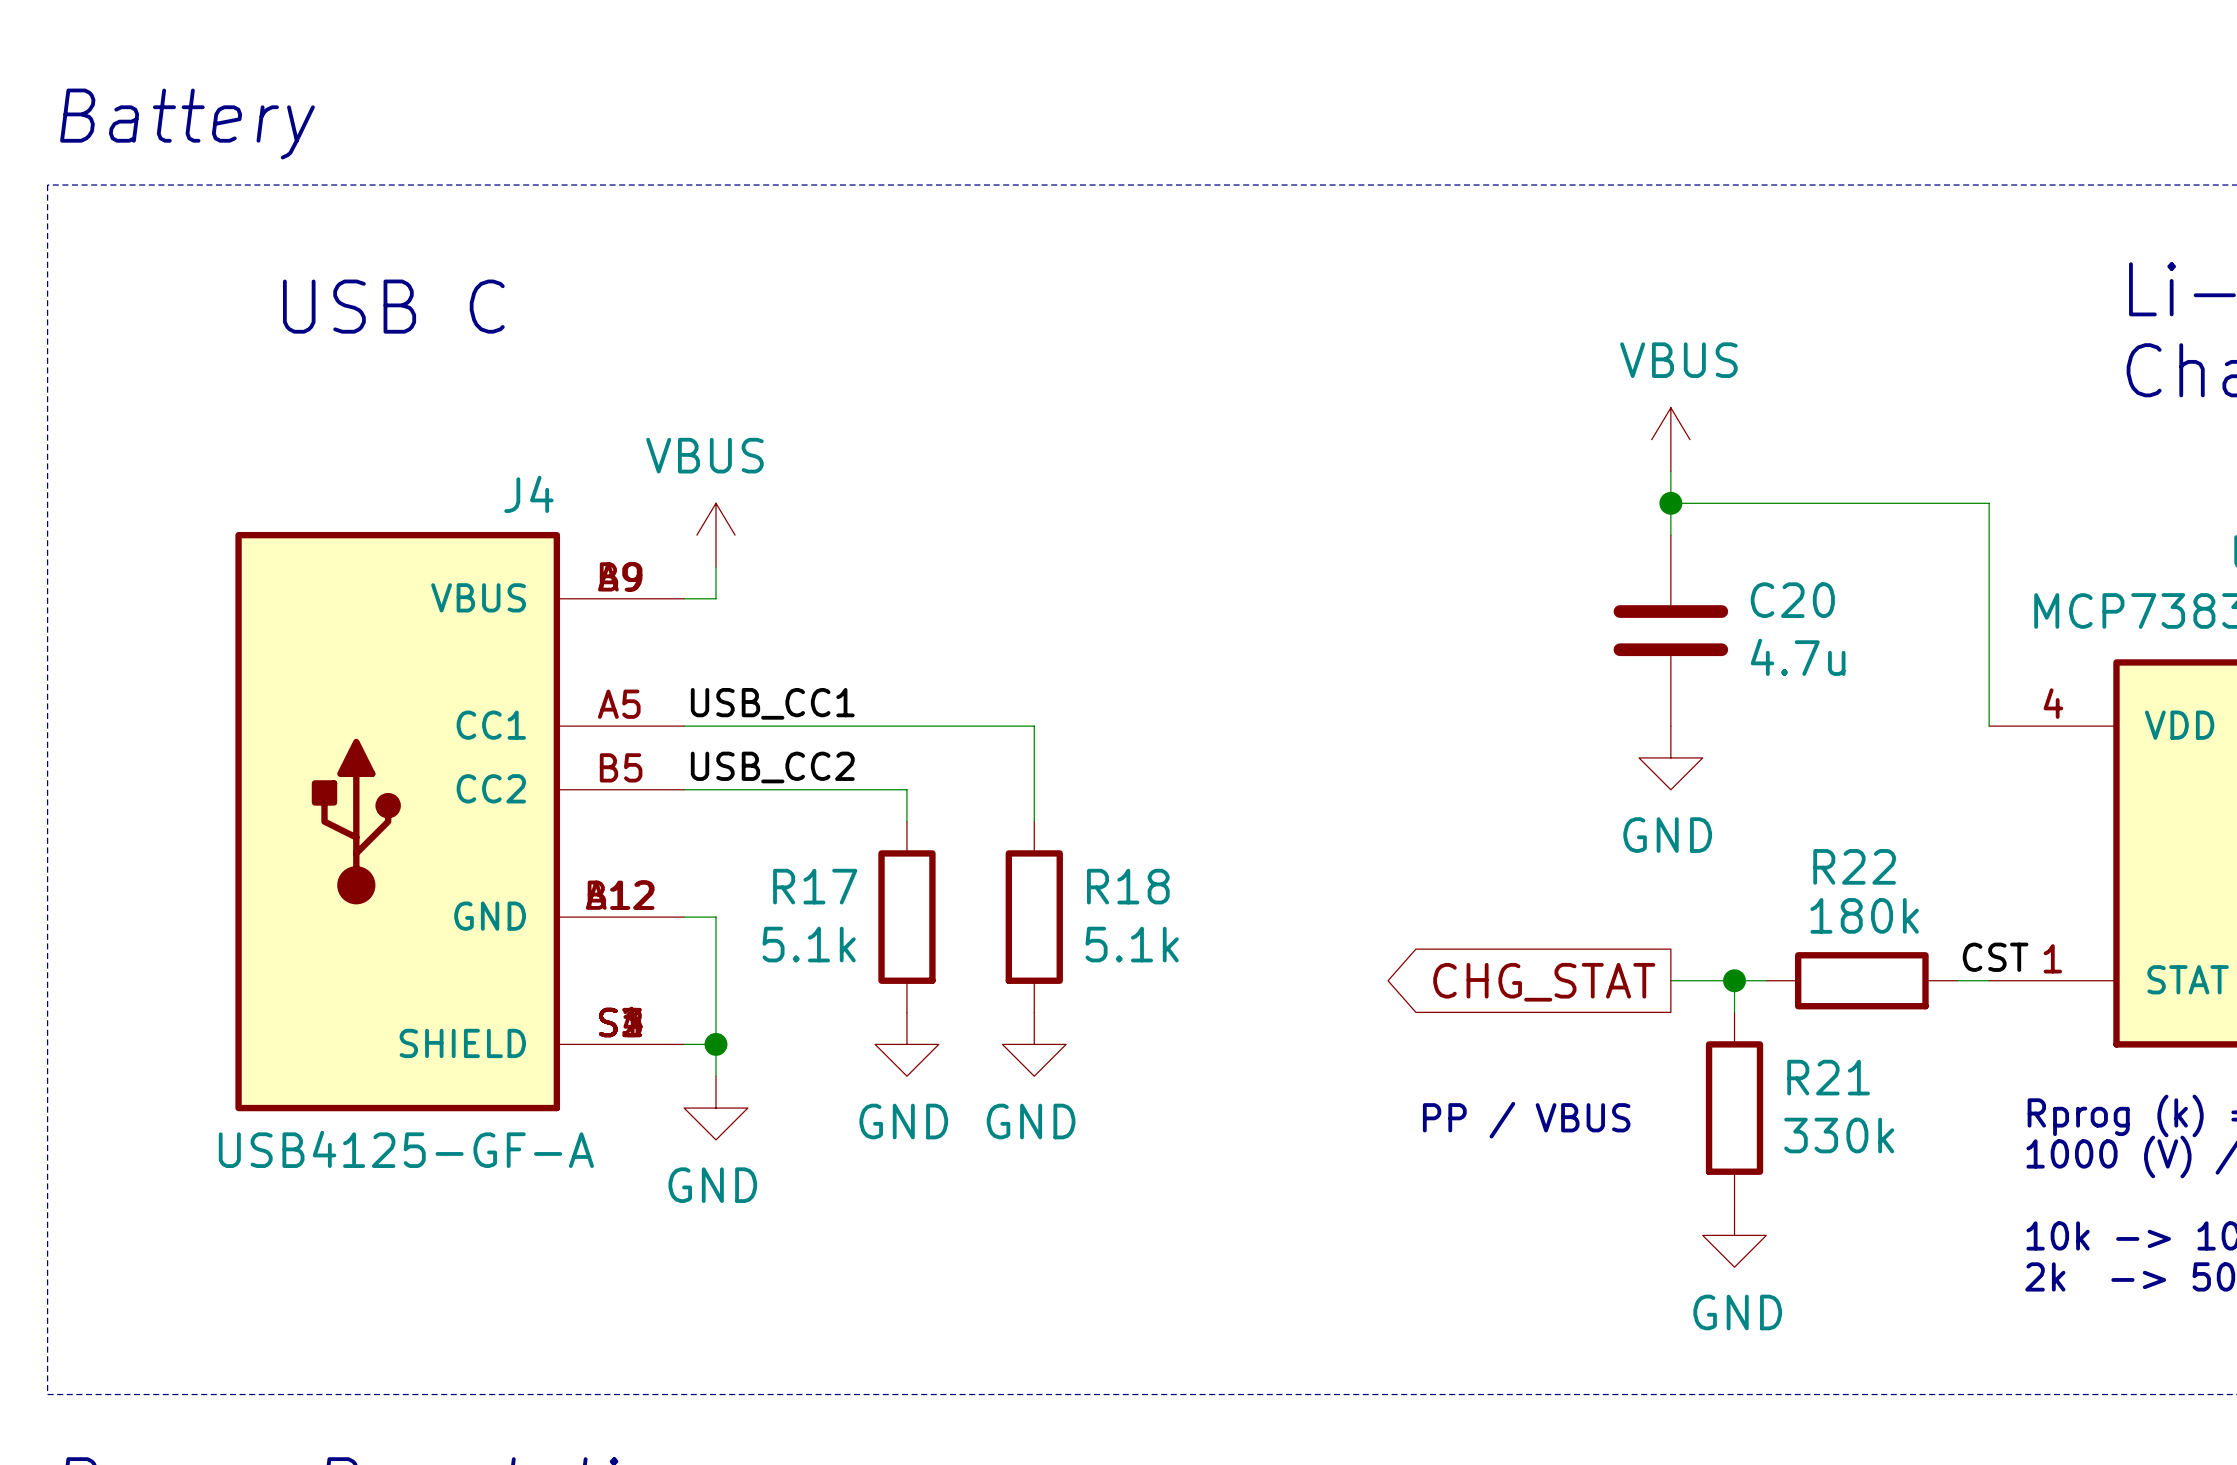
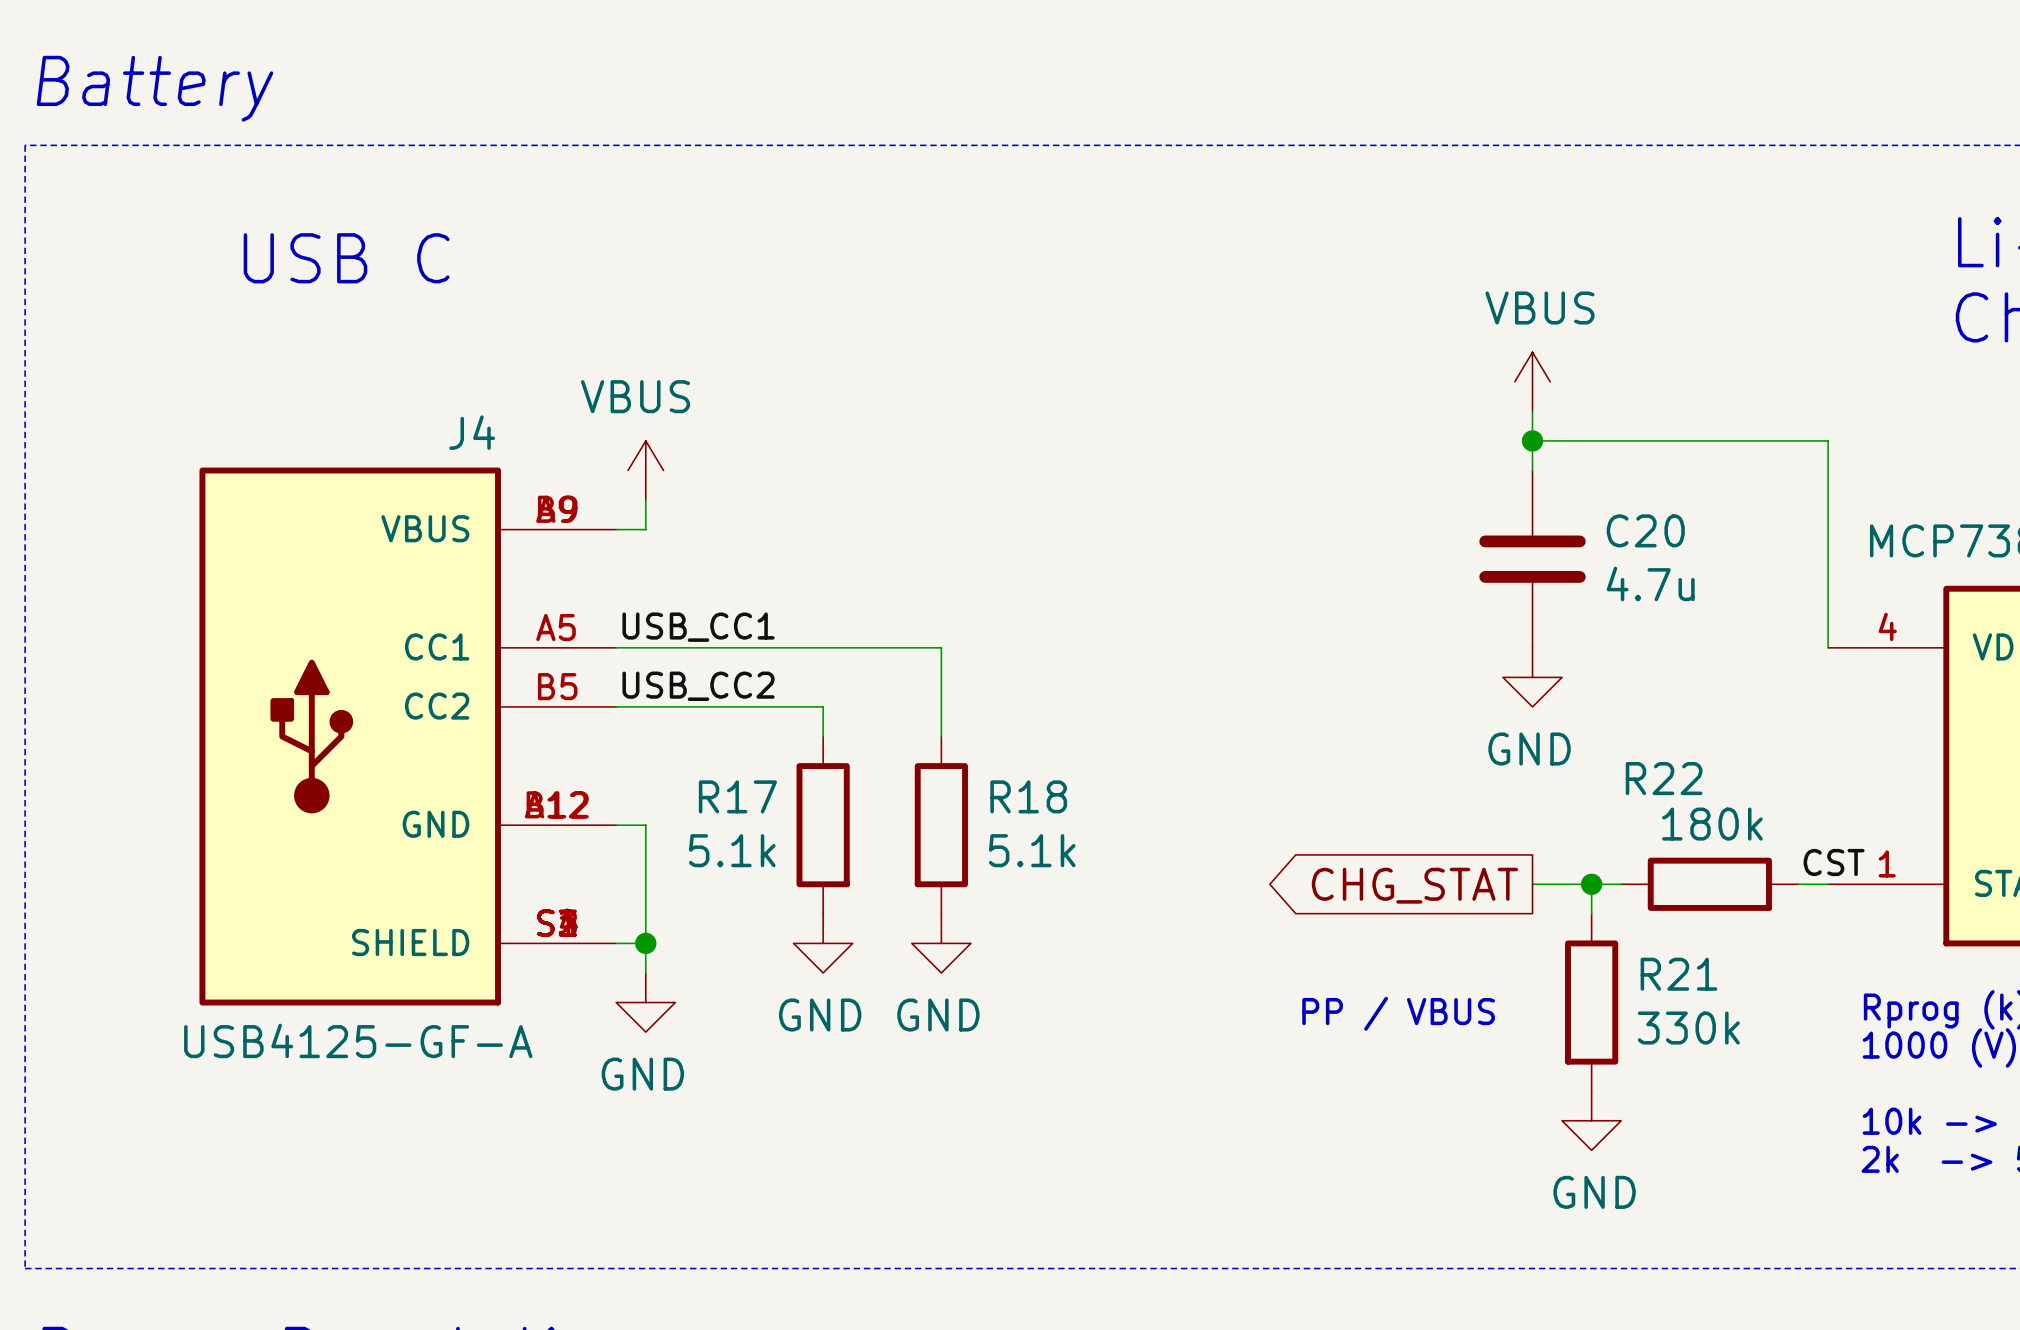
R22 name position: R22 (1854, 866) -> R22 (1664, 778)

